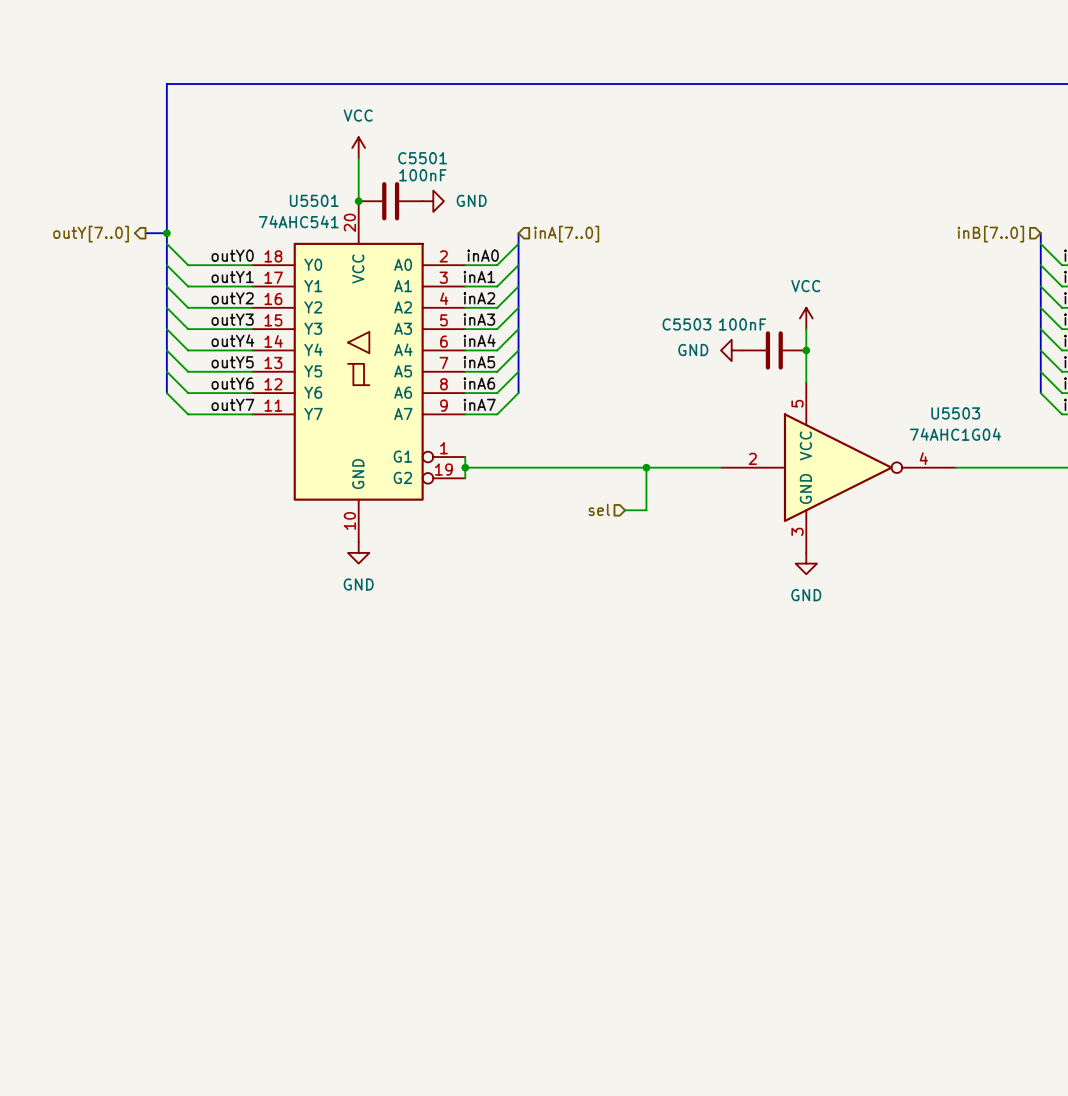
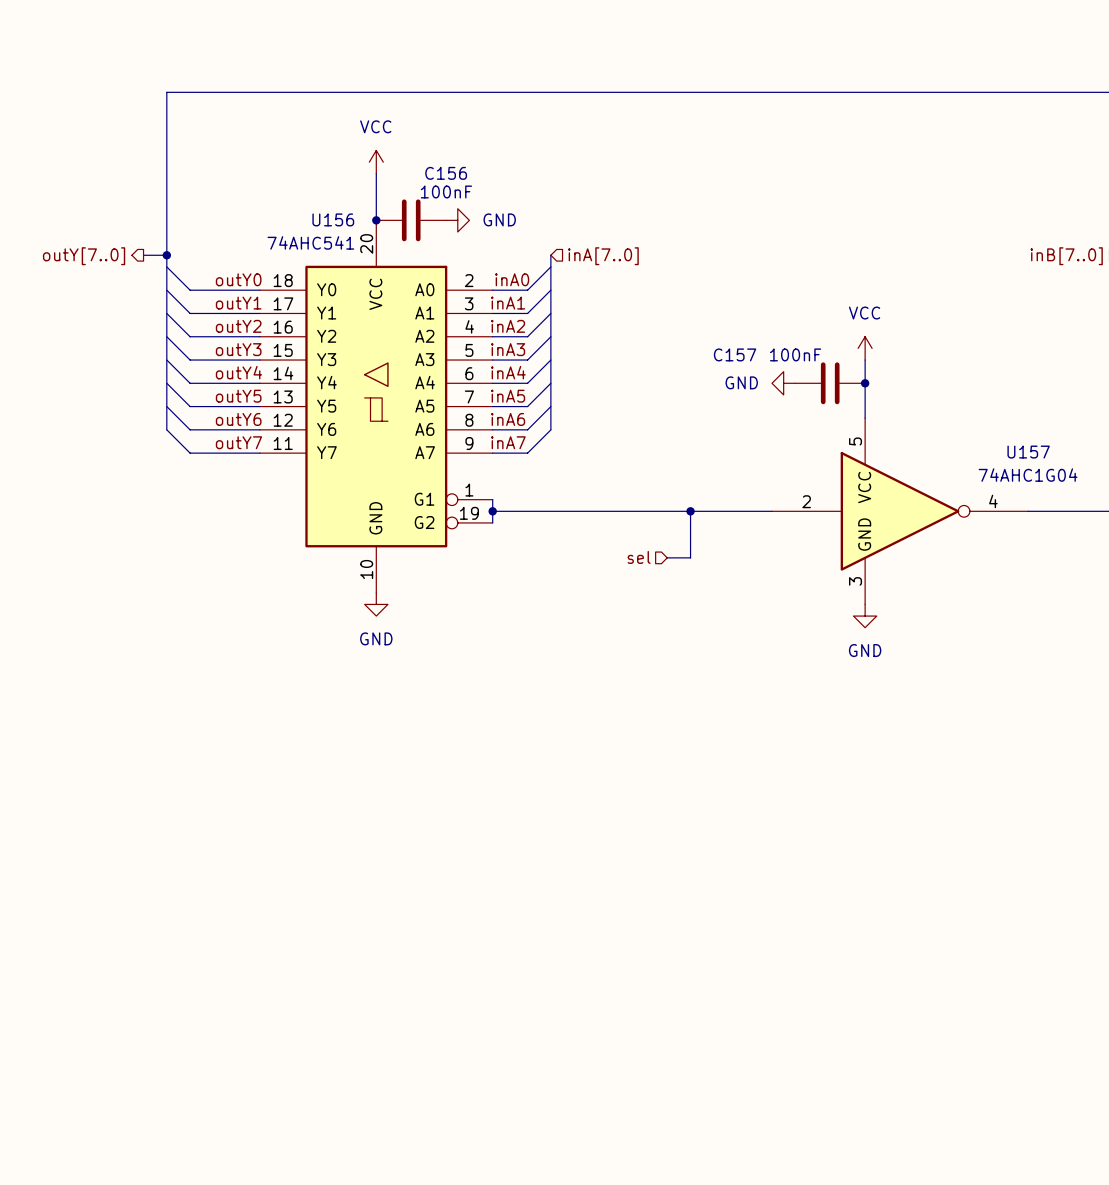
C5501 name: C5501 (422, 158) -> C156 (446, 173)
U5501 name: U5501 (314, 200) -> U156 (333, 219)
C5503 name: C5503 (686, 324) -> C157 (735, 354)
U5503 name: U5503 (955, 413) -> U157 (1028, 452)

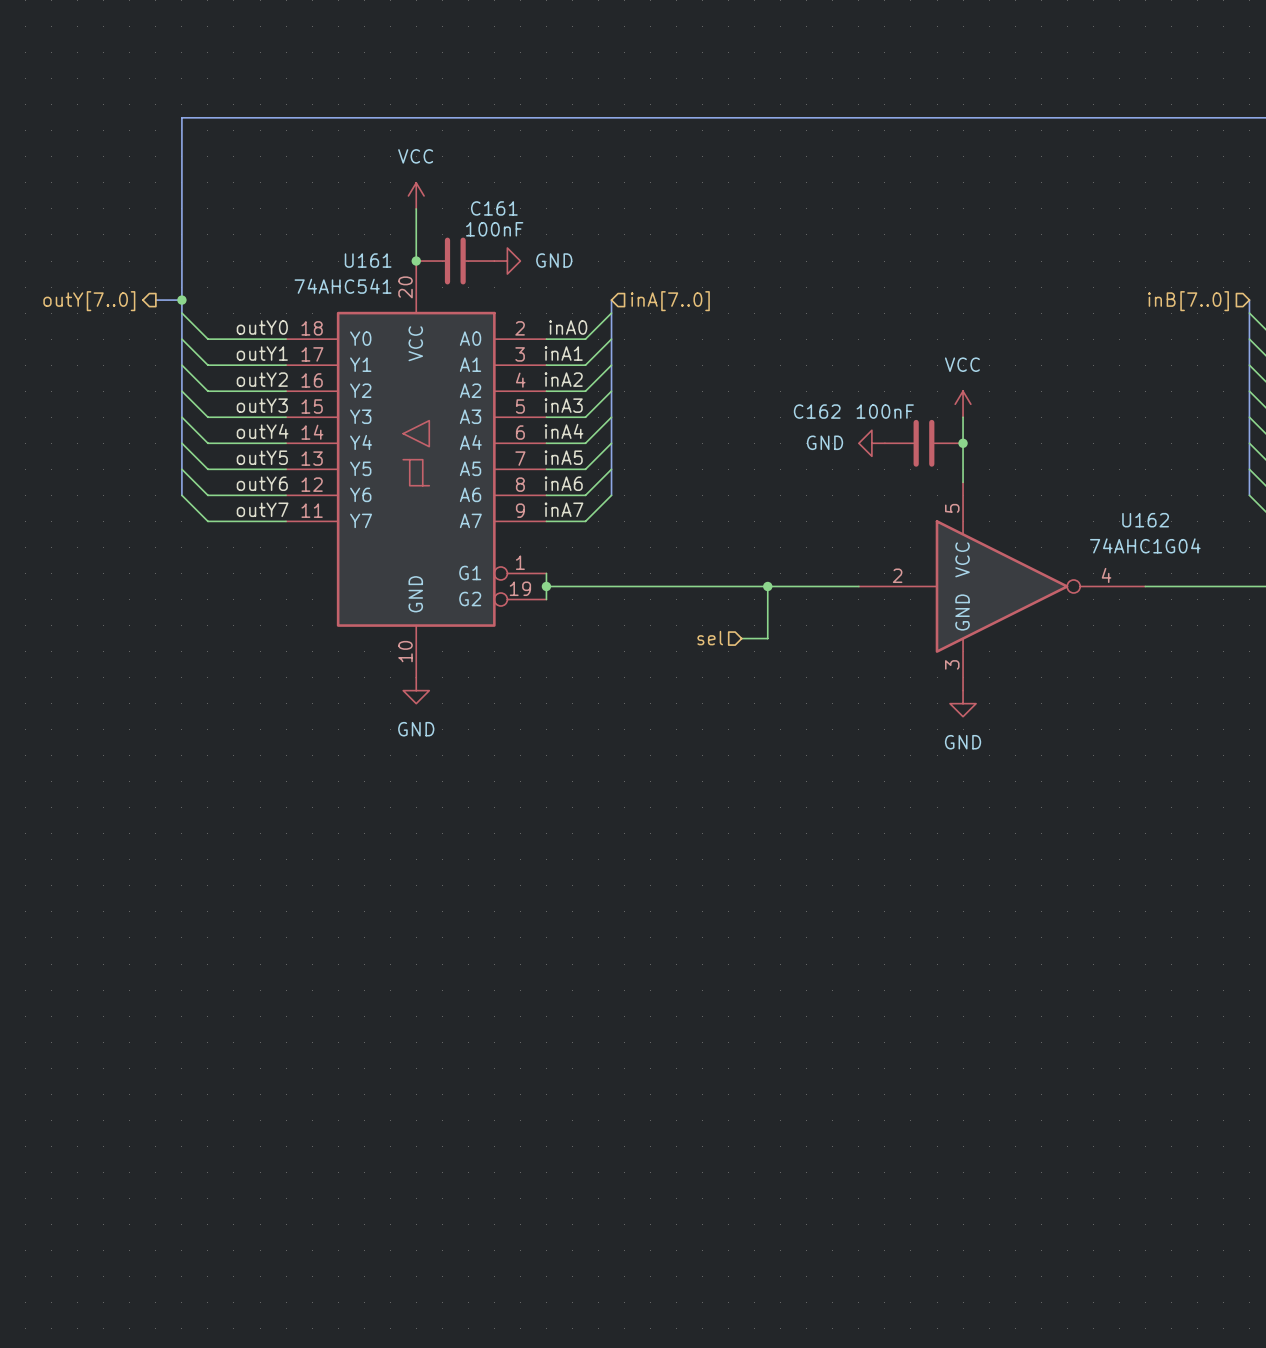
C156 name: C156 (446, 173) -> C161 (494, 208)
U156 name: U156 (333, 219) -> U161 (368, 260)
C157 name: C157 (735, 354) -> C162 (817, 411)
U157 name: U157 (1028, 452) -> U162 (1145, 520)

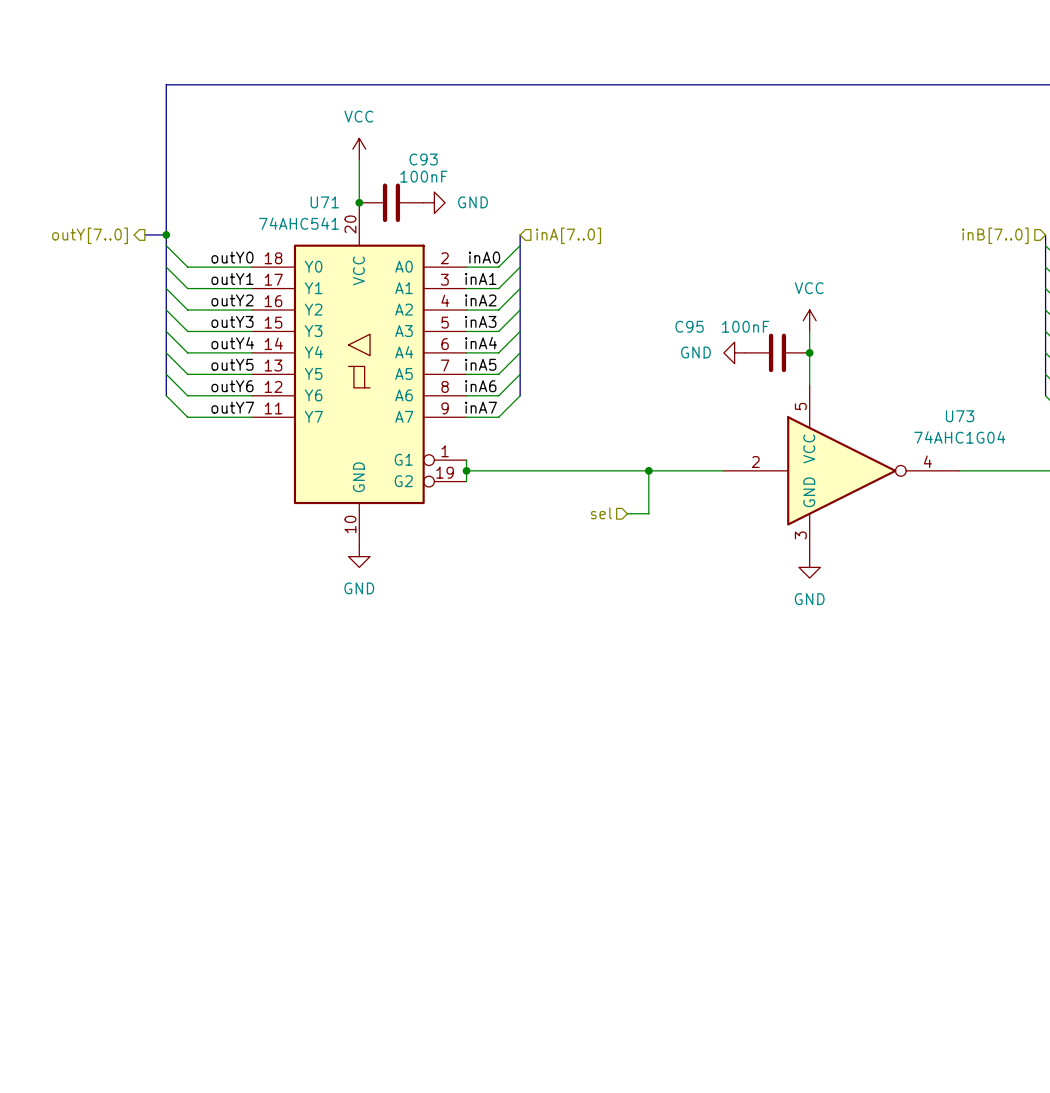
C161 name: C161 (494, 208) -> C93 (423, 159)
U161 name: U161 (368, 260) -> U71 (324, 202)
C162 name: C162 (817, 411) -> C95 (689, 326)
U162 name: U162 (1145, 520) -> U73 (960, 416)

